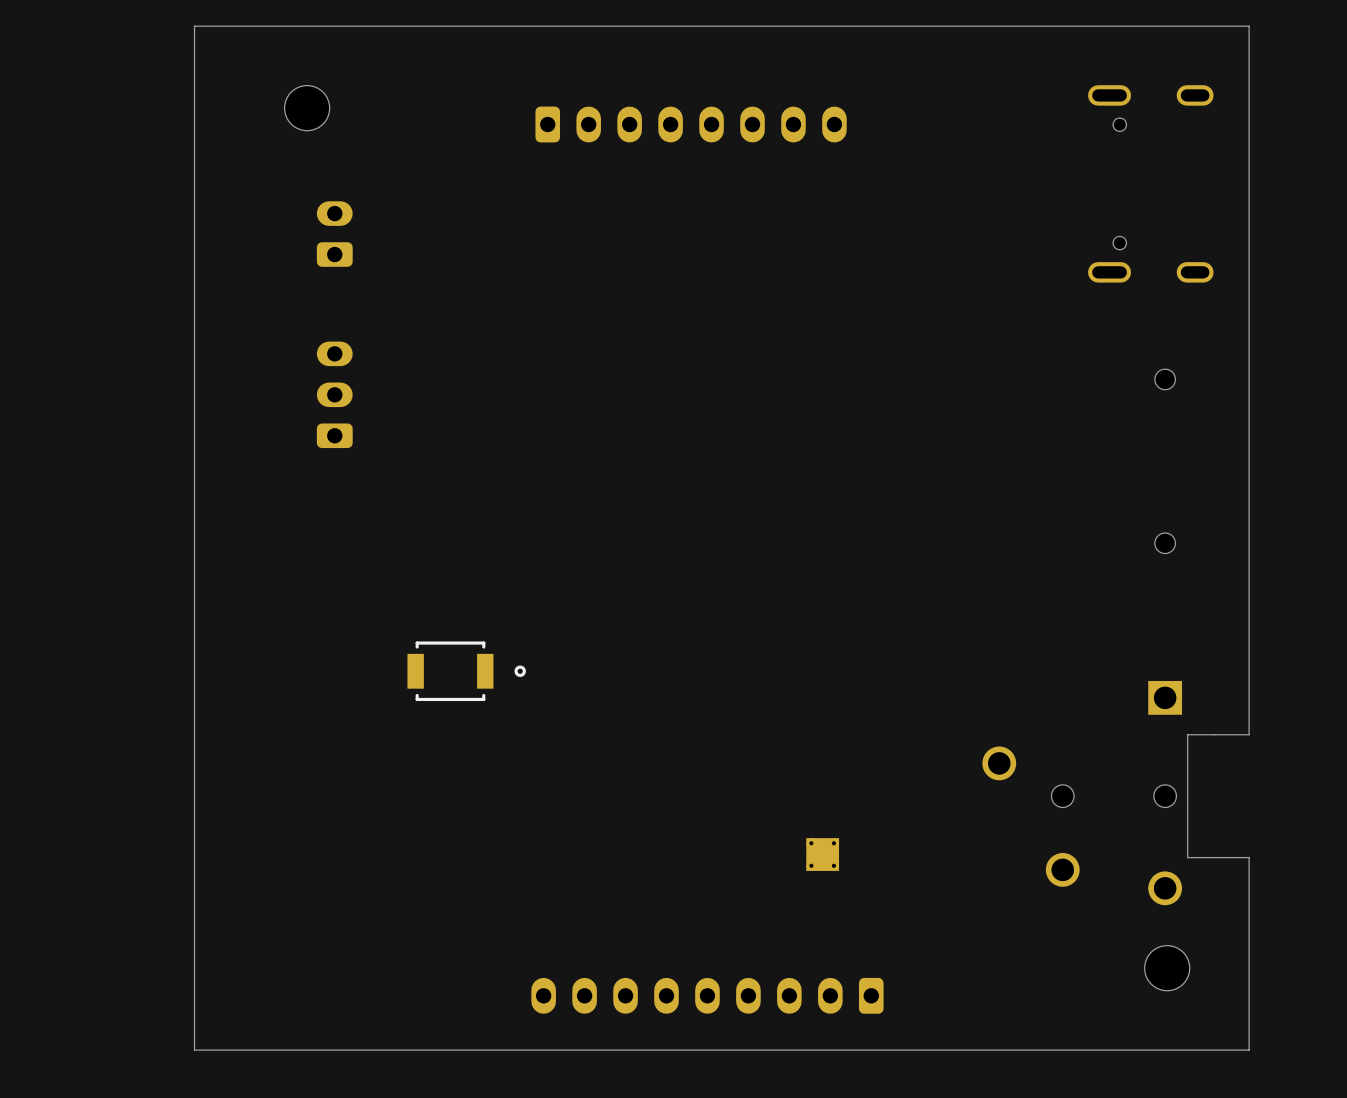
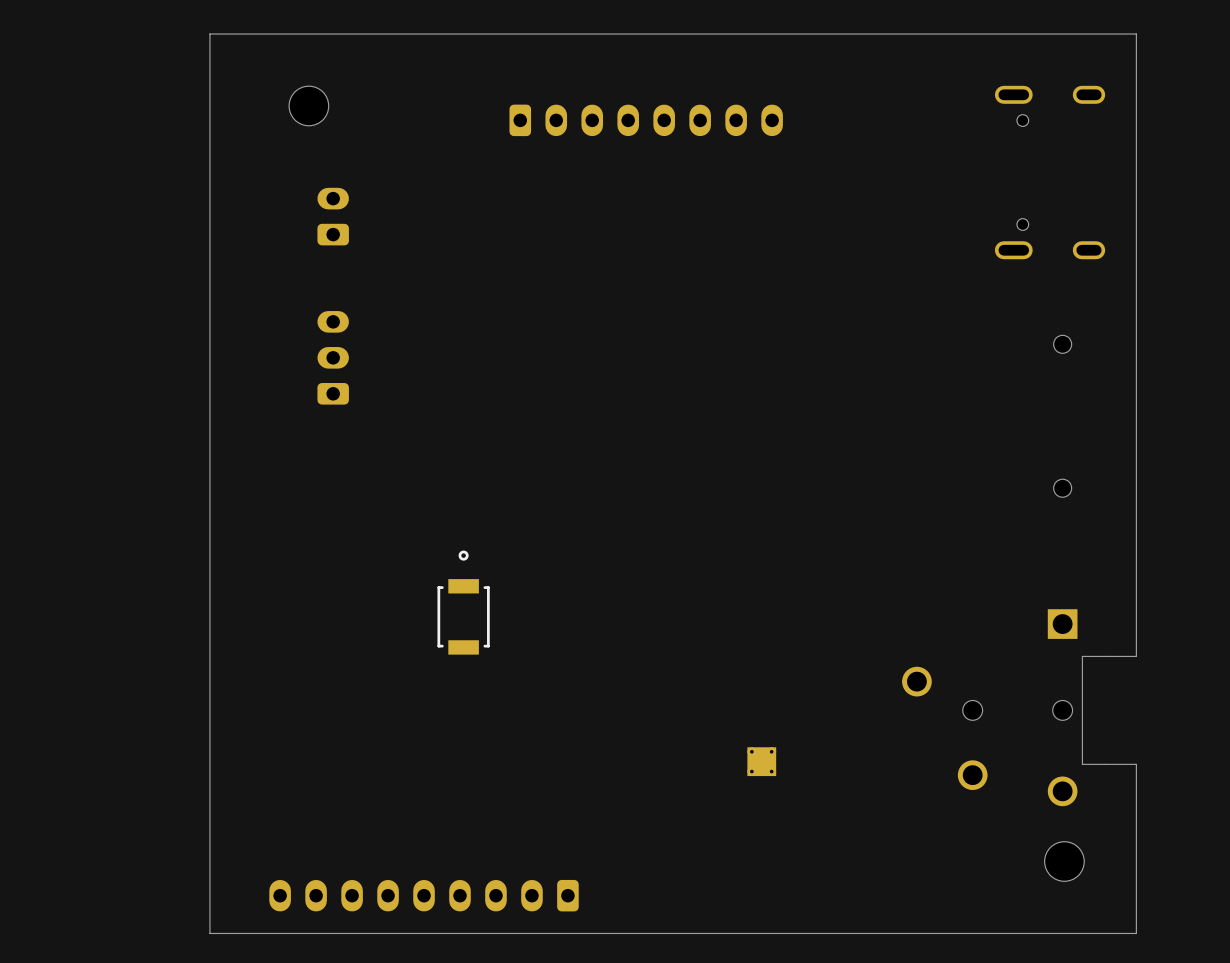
part rotation: 0° (466, 671) -> 90° counterclockwise (463, 602)
part position: (707, 995) -> (424, 895)

